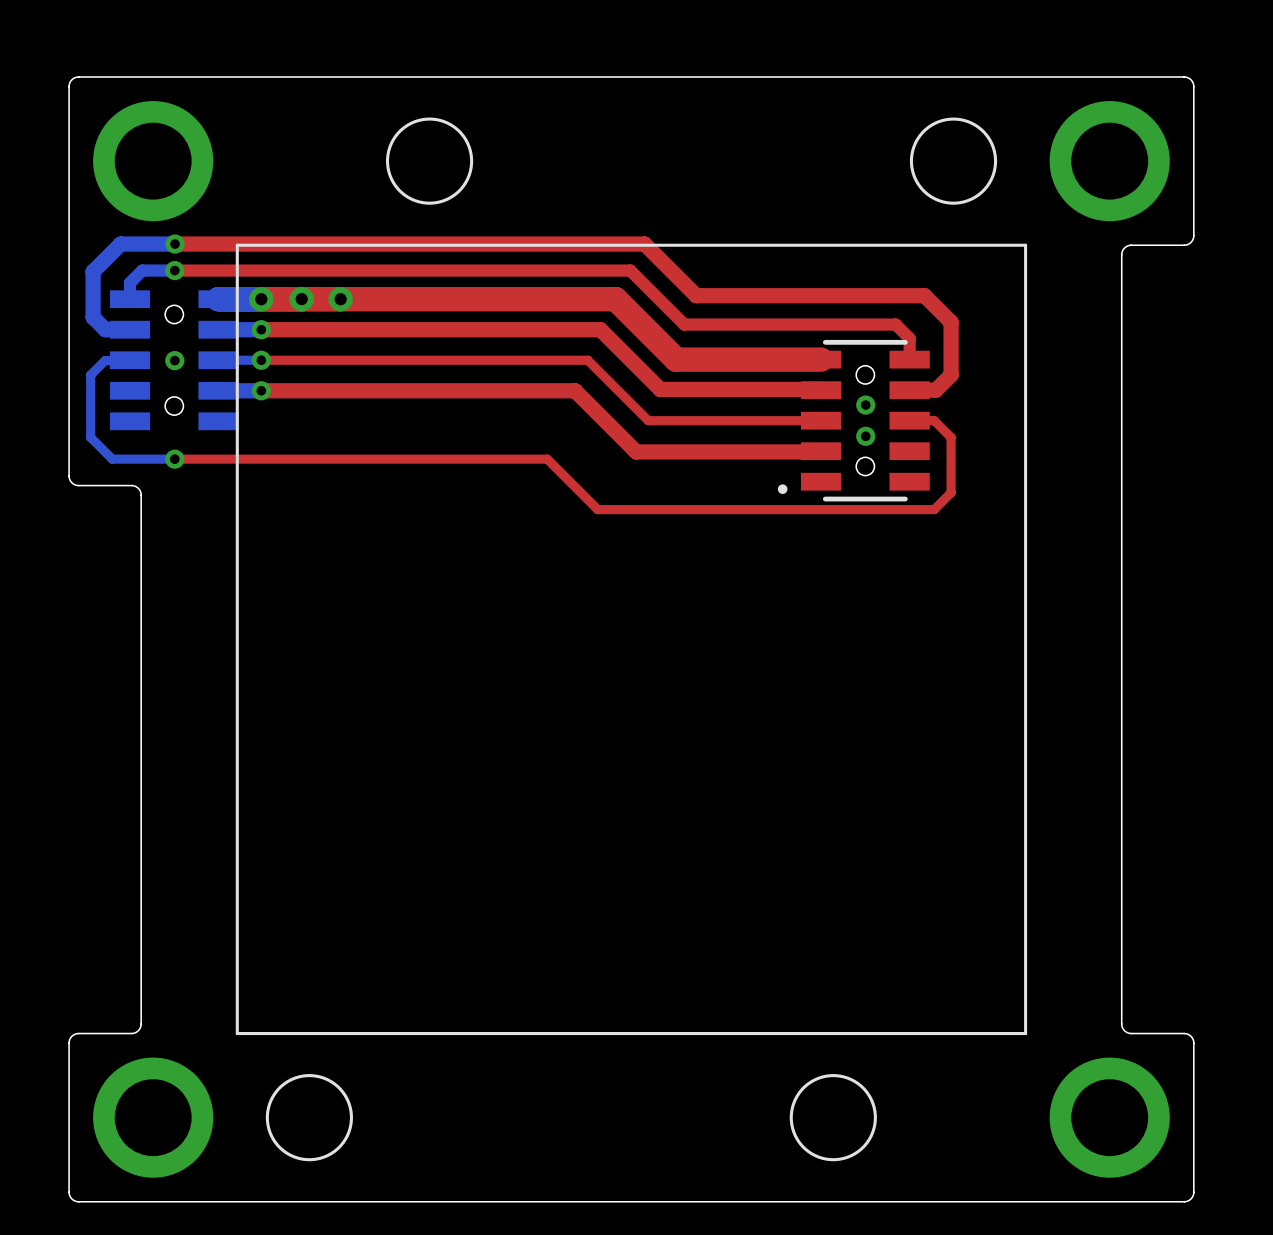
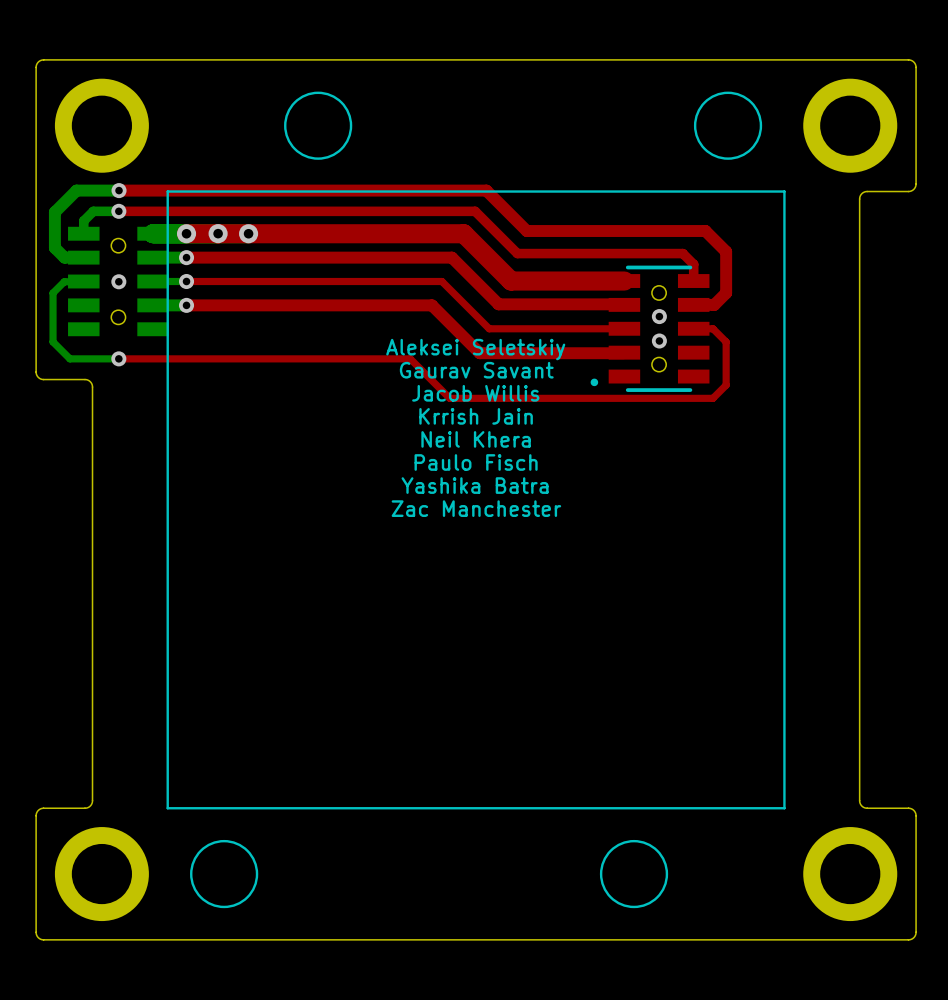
text: none -> Aleksei Seletskiy (475, 349)
text: none -> Gaurav Savant (476, 370)
text: none -> Jacob Willis (475, 393)
text: none -> Krrish Jain (476, 416)
text: none -> Neil Khera (476, 439)
text: none -> Paulo Fisch (476, 462)
text: none -> Yashika Batra (475, 485)
text: none -> Zac Manchester (476, 508)

